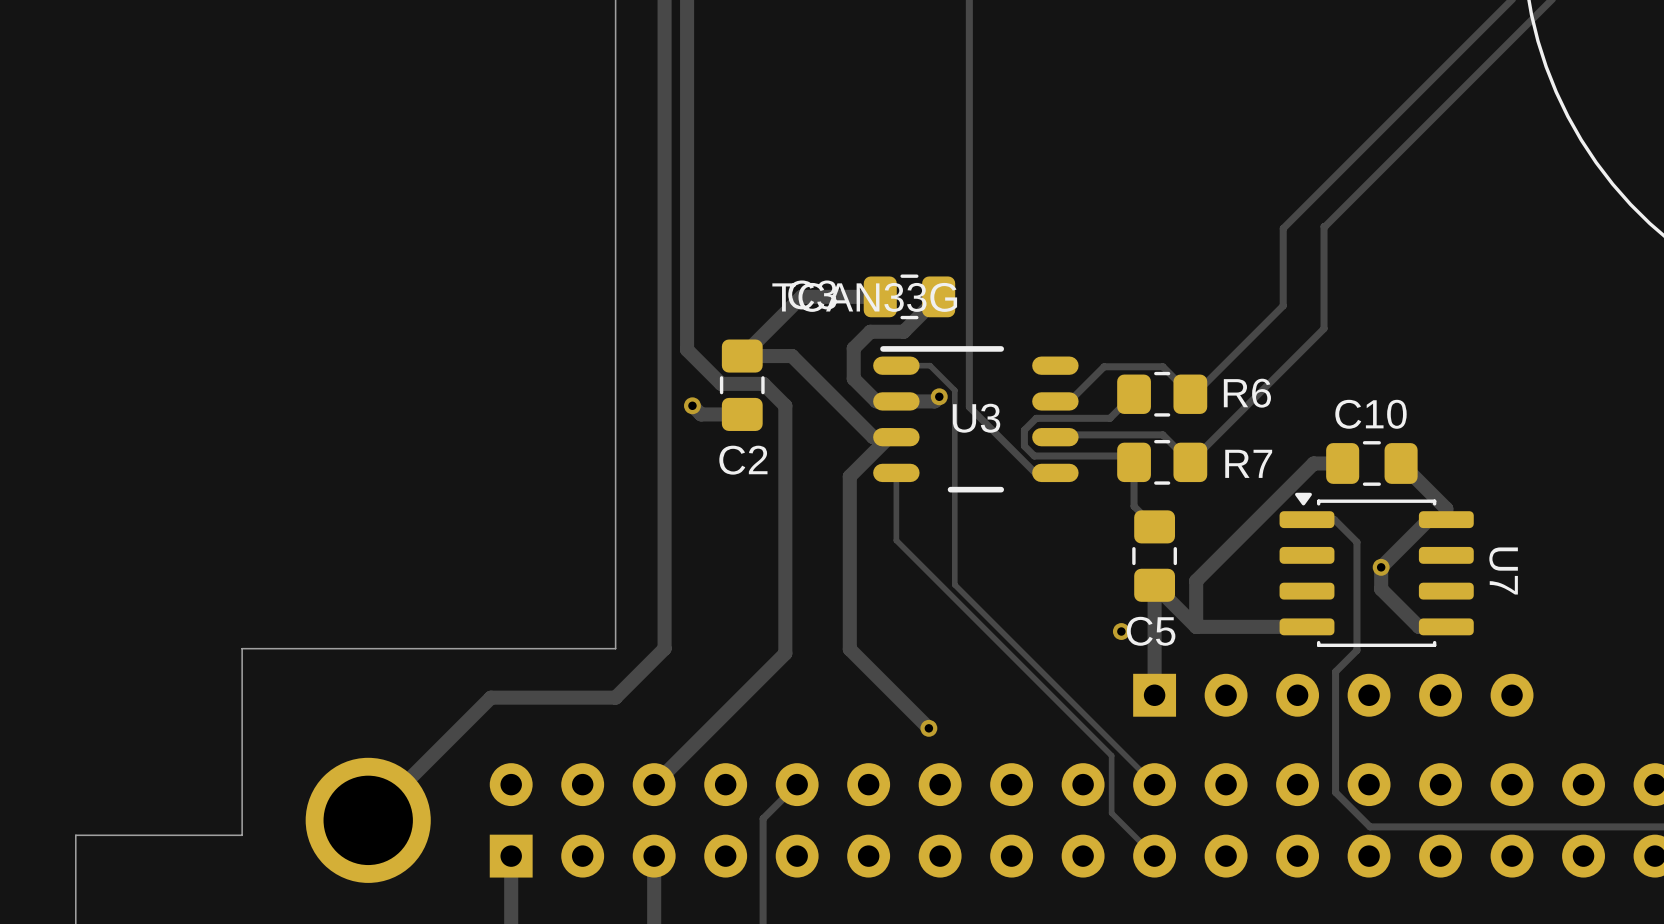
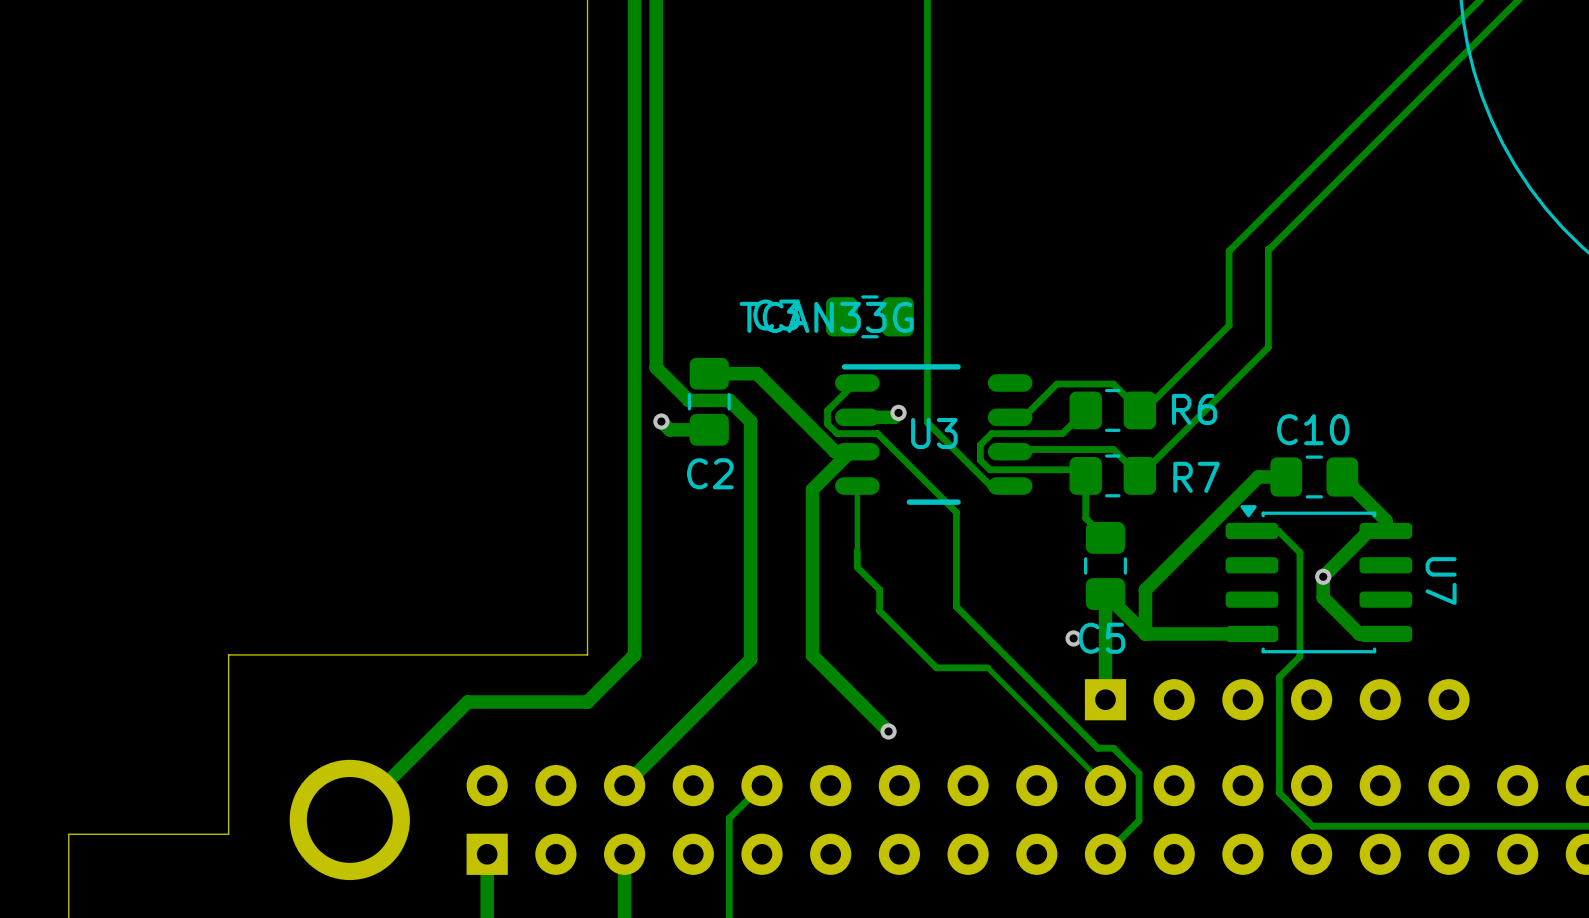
track: (880, 296) (801, 296) (742, 356) -> none
track: (938, 296) (903, 331) (870, 331) (853, 348) (853, 378) (876, 401) (896, 401) -> none
track: (896, 365) (930, 365) (954, 390) (954, 584) (1032, 662) -> (857, 550) (857, 567) (879, 589) (879, 611) (936, 667) (987, 667)
track: (896, 540) (1111, 755) (1111, 813) (1154, 856) -> (857, 382) (827, 410) (827, 424) (837, 433) (877, 433) (956, 512) (956, 606) (1097, 748) (1113, 748) (1139, 773) (1139, 820) (1105, 854)

